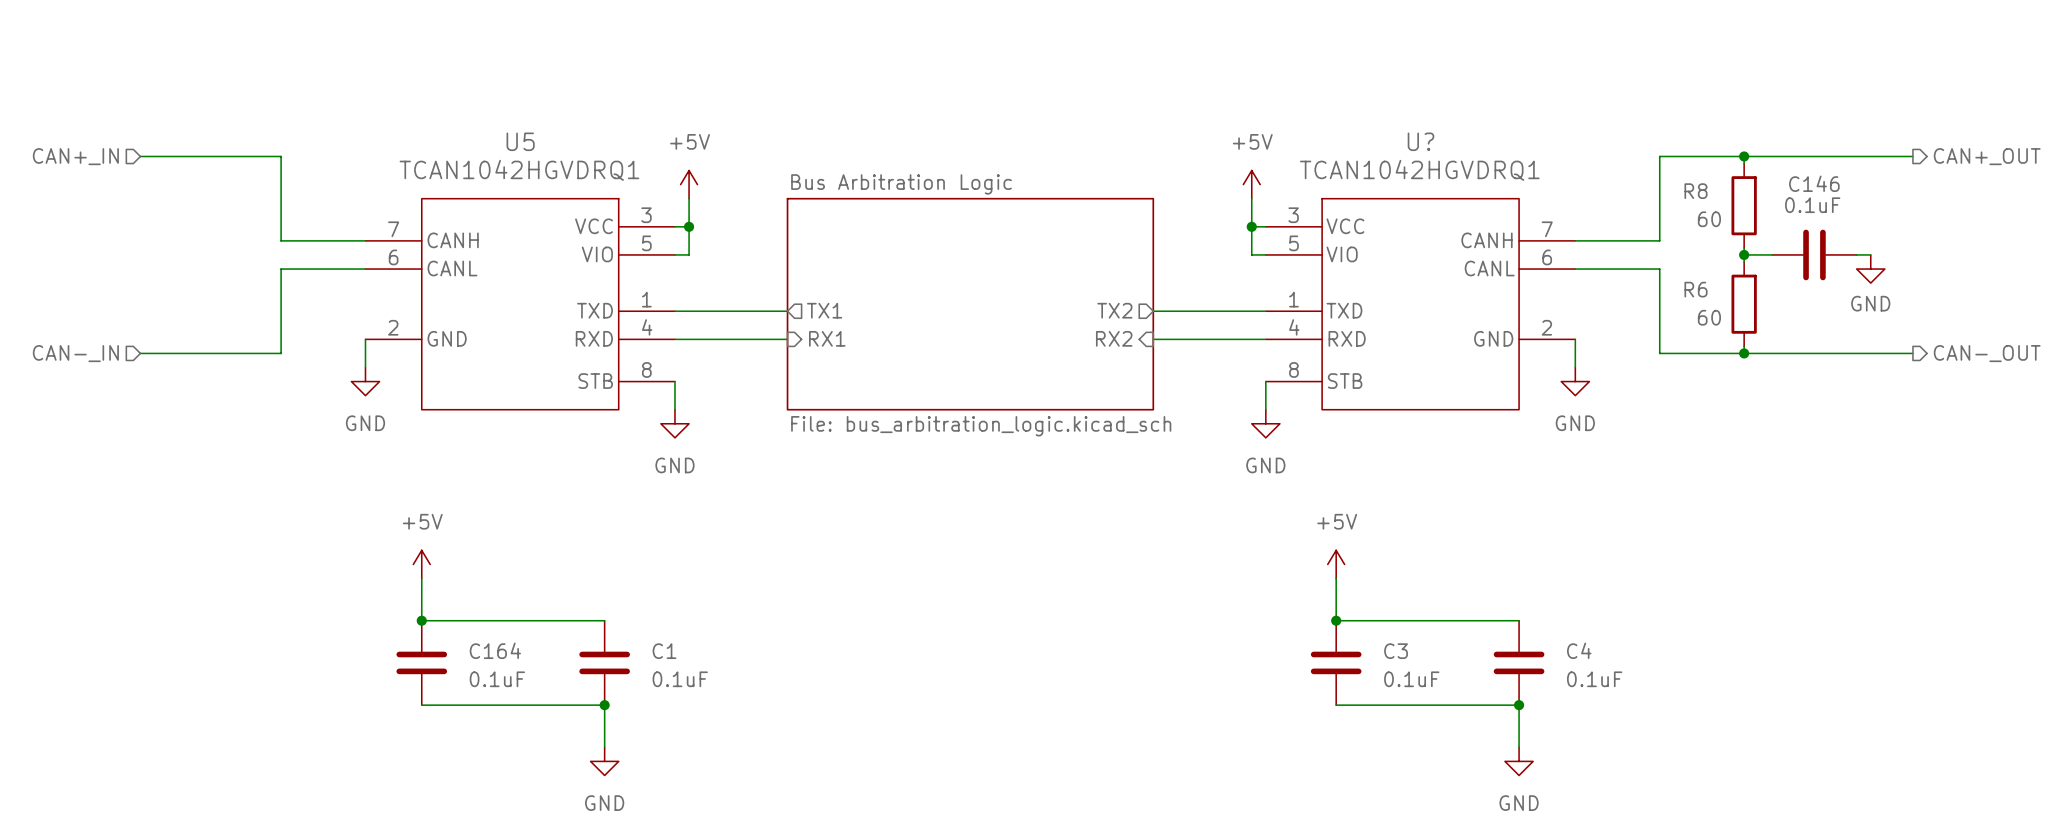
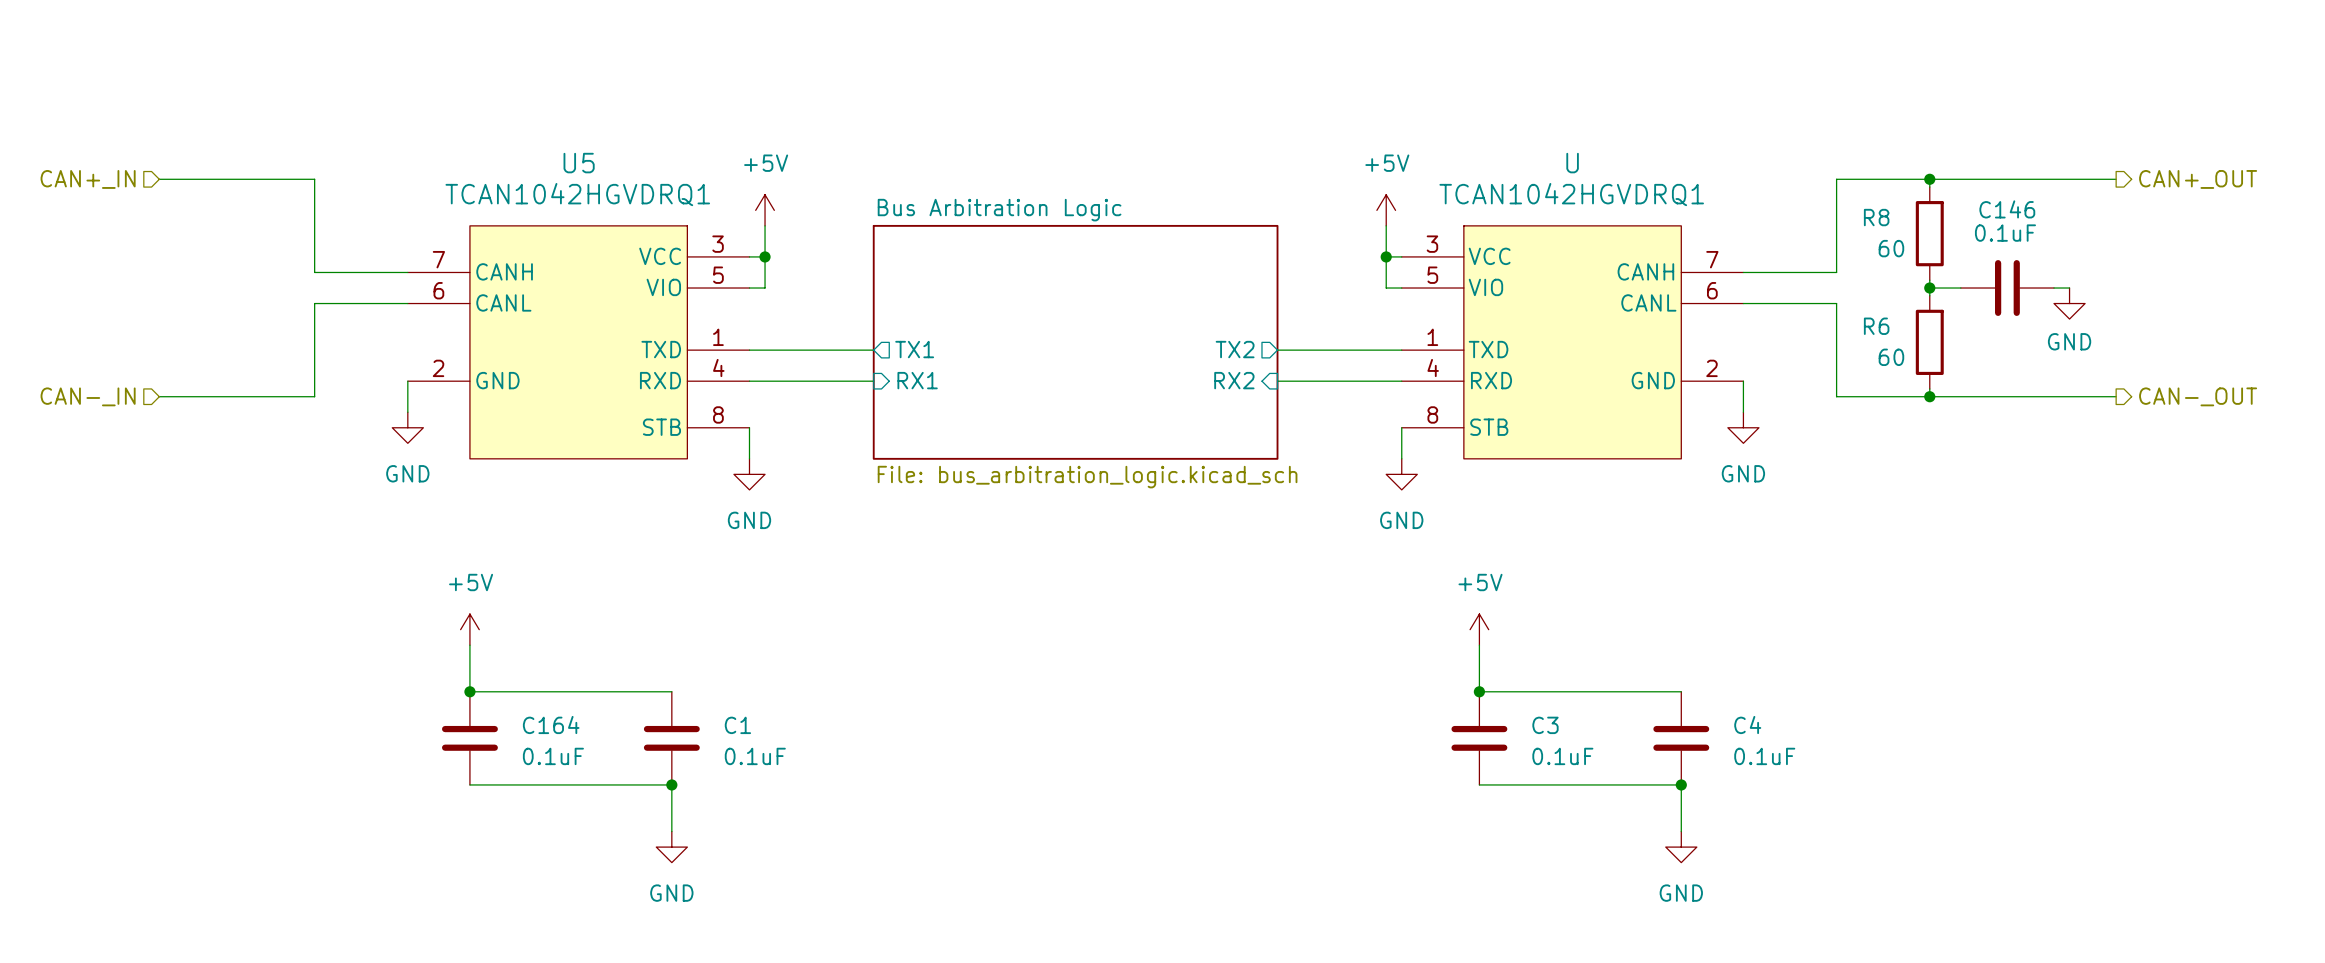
U? name: U? (1420, 141) -> U (1572, 163)

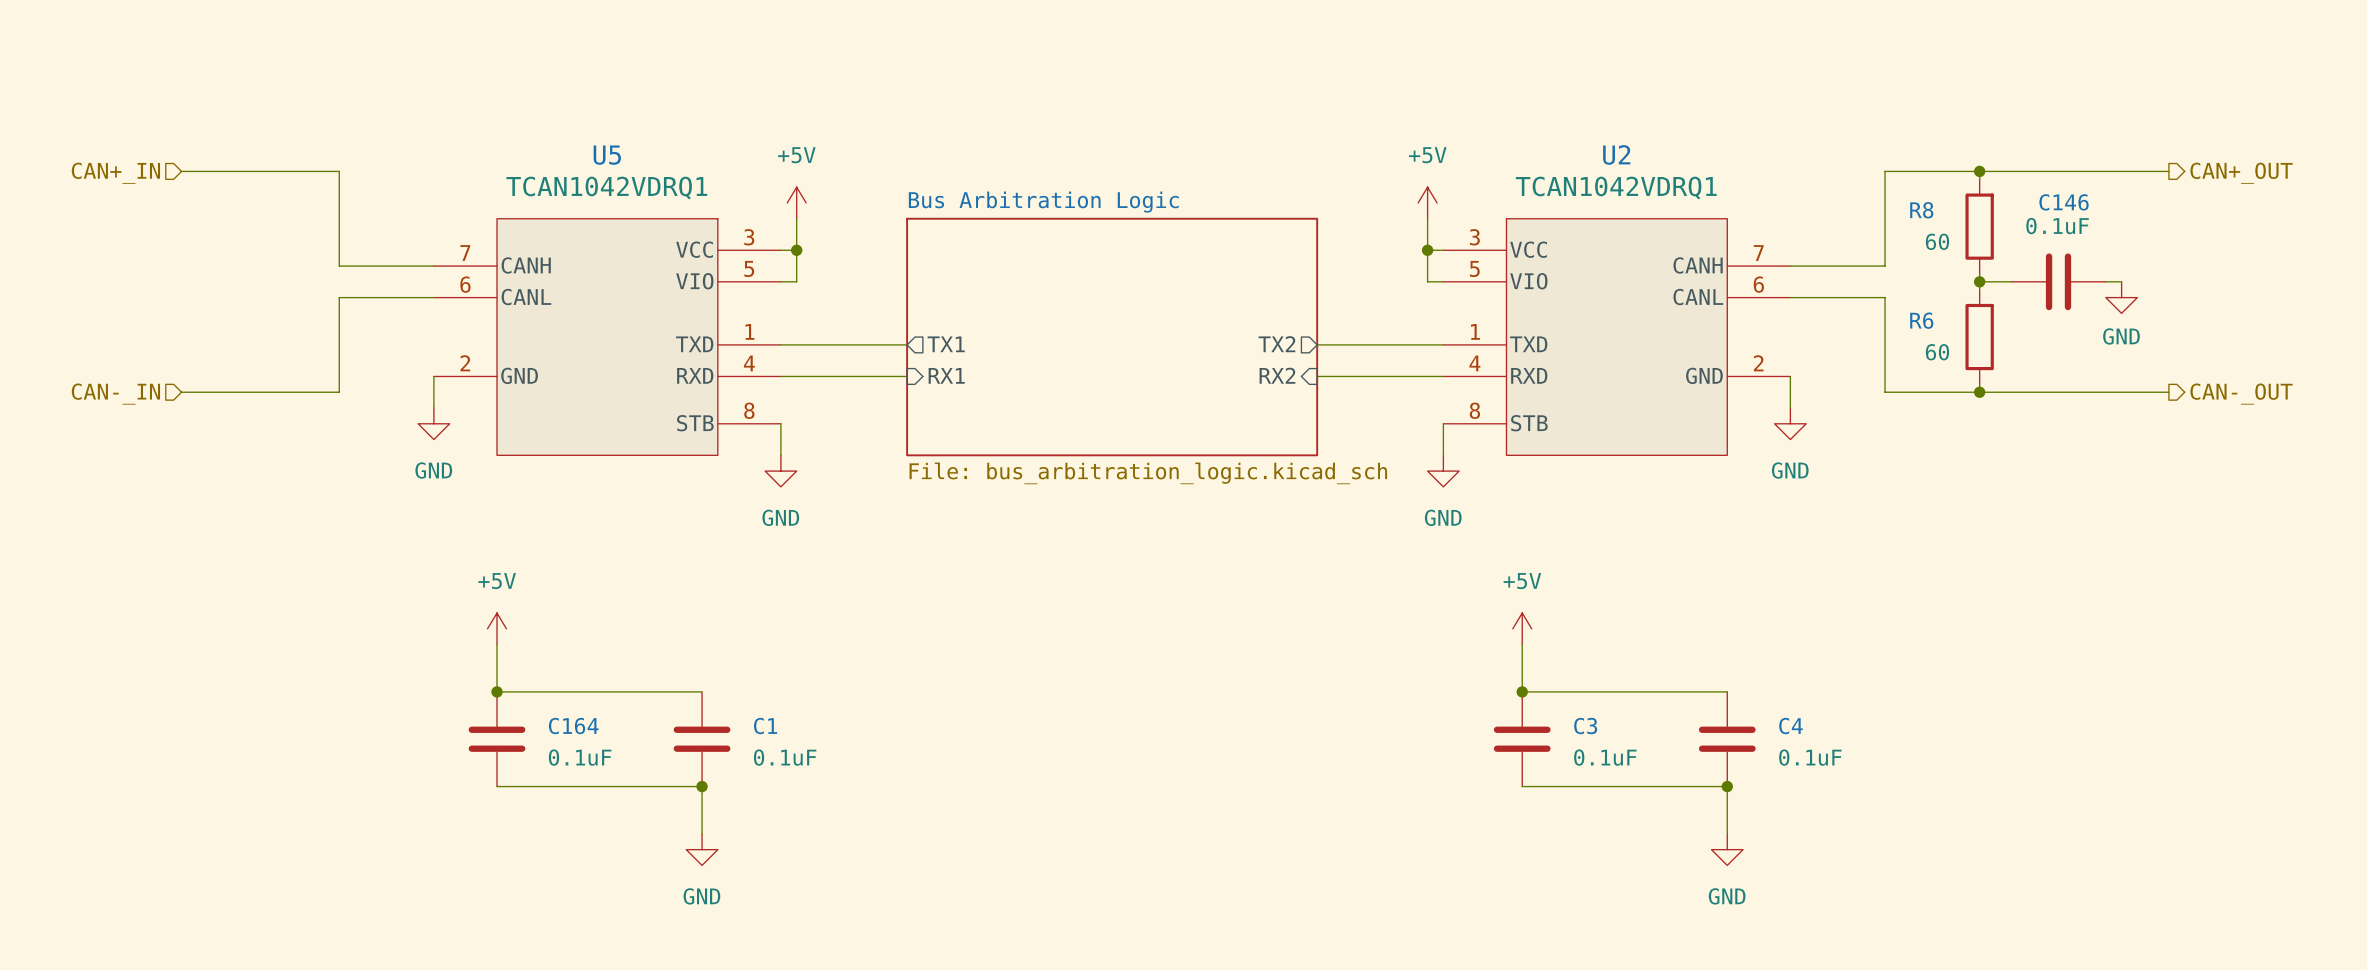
U name: U (1572, 163) -> U2 (1616, 154)
U5 value: TCAN1042HGVDRQ1 (577, 194) -> TCAN1042VDRQ1 (606, 188)
U value: TCAN1042HGVDRQ1 (1571, 194) -> TCAN1042VDRQ1 (1616, 188)

